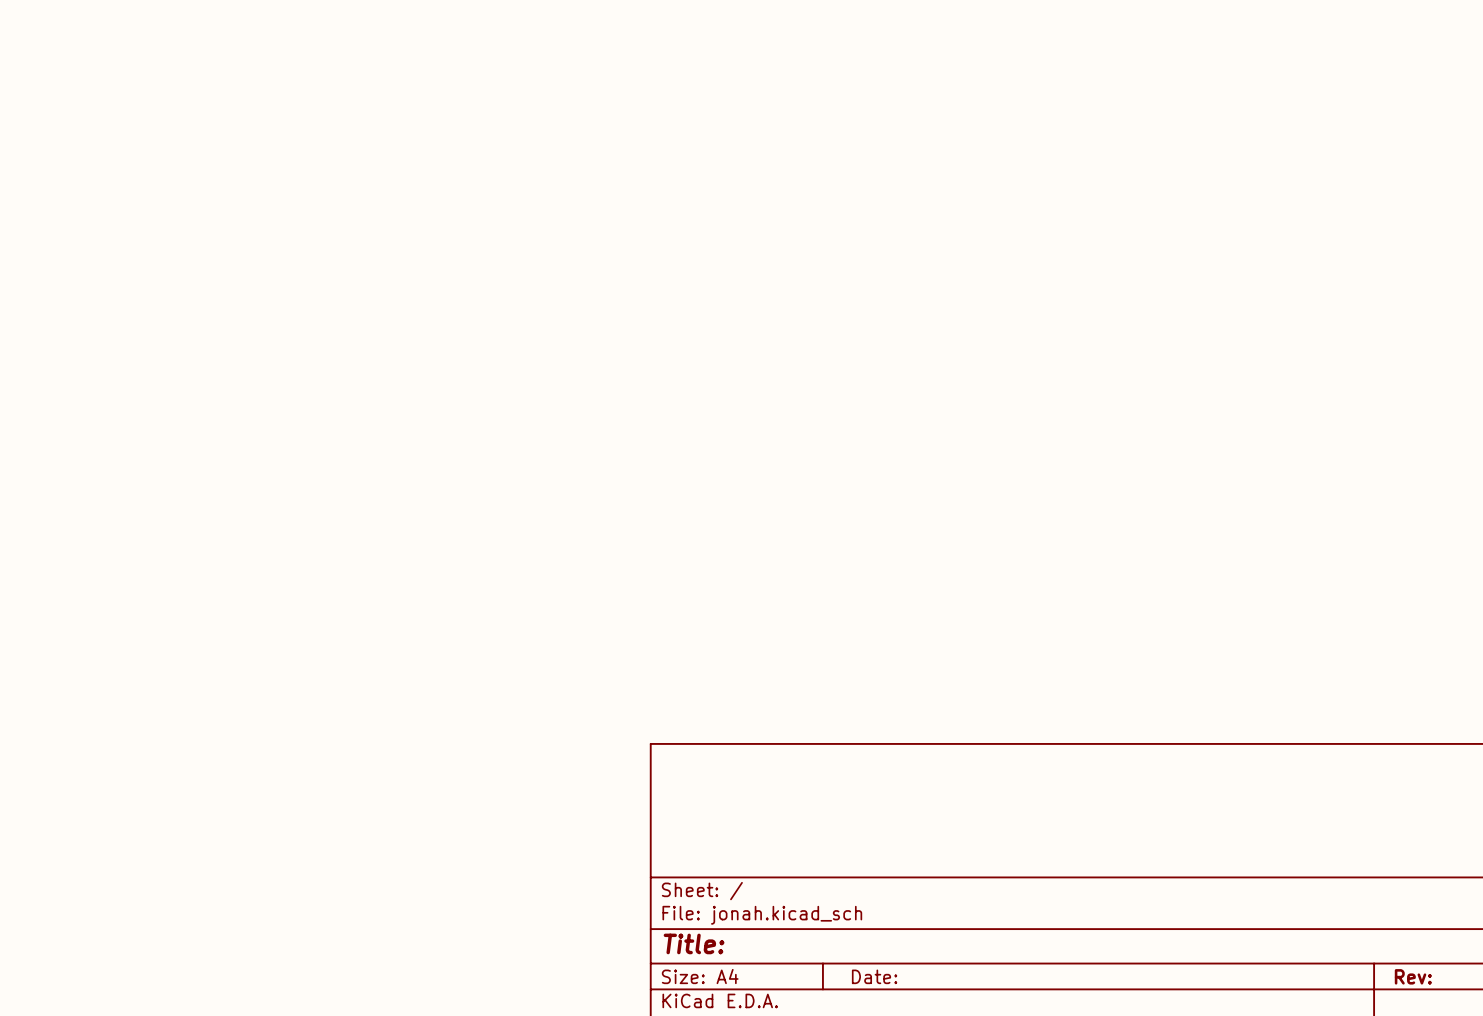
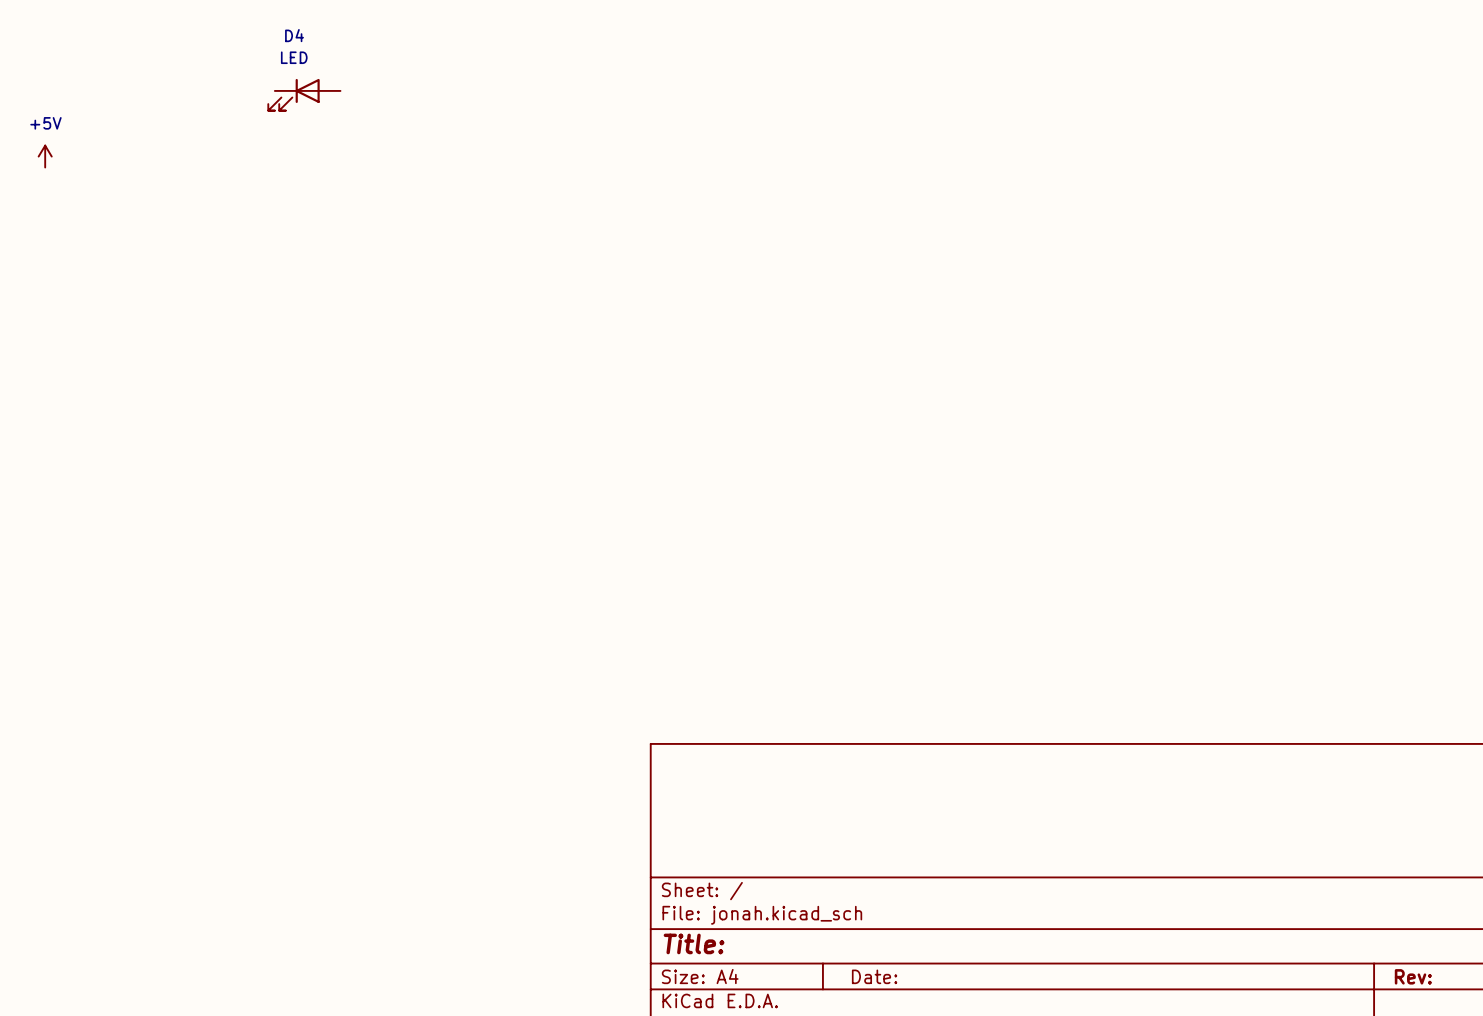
D4: none -> LED (304, 94)
power symbol: none -> +5V (45, 156)

